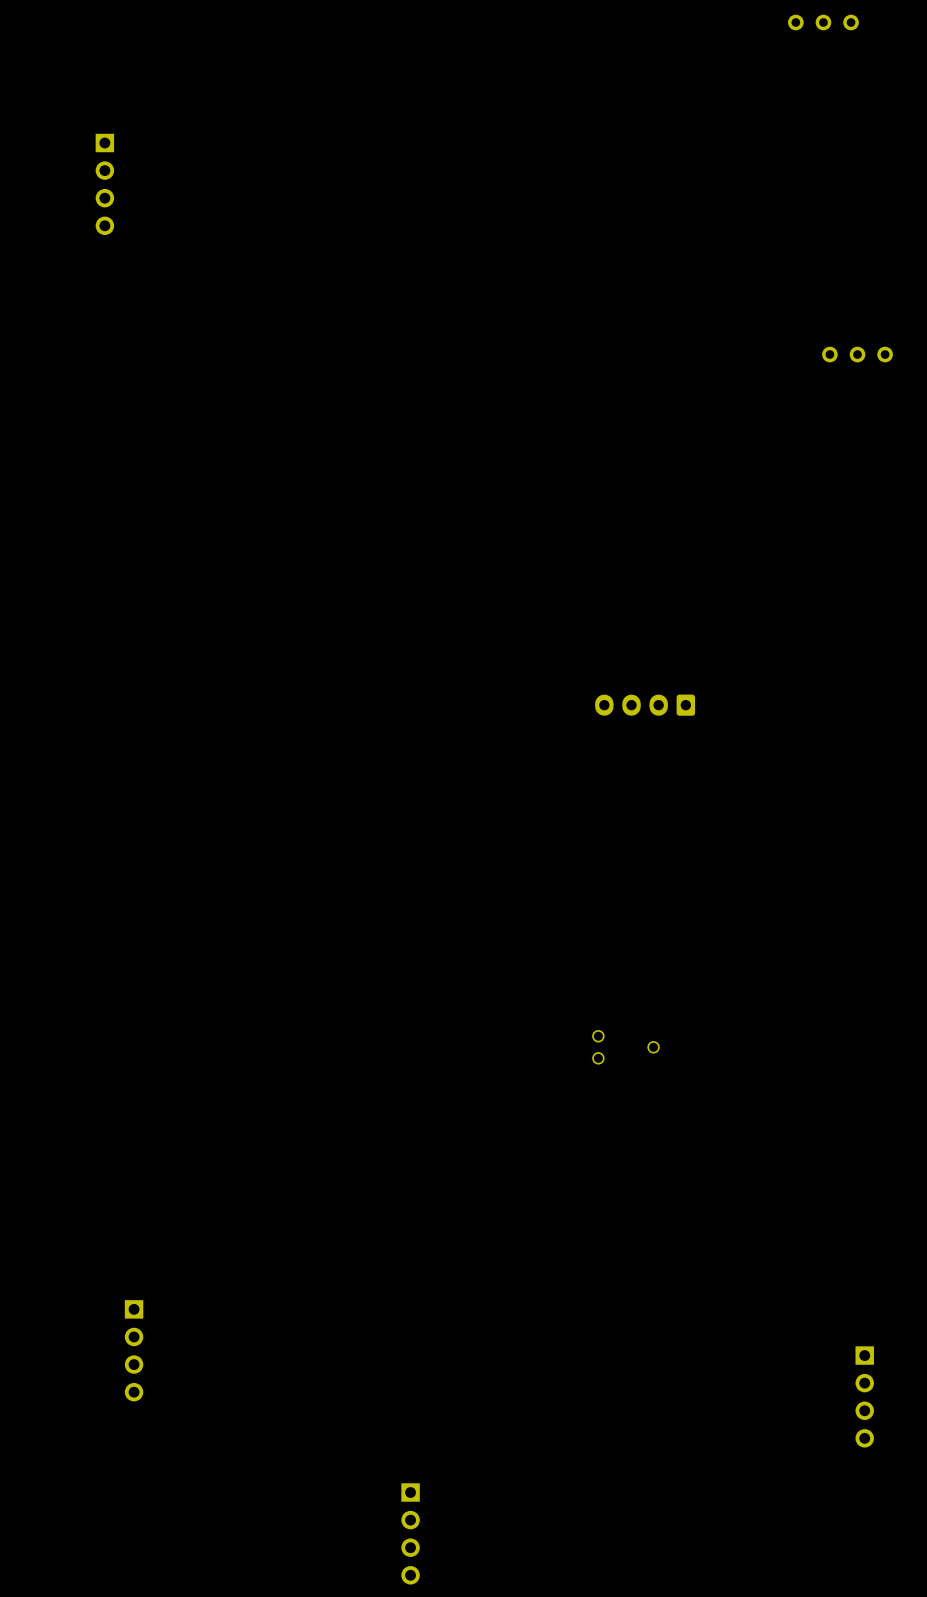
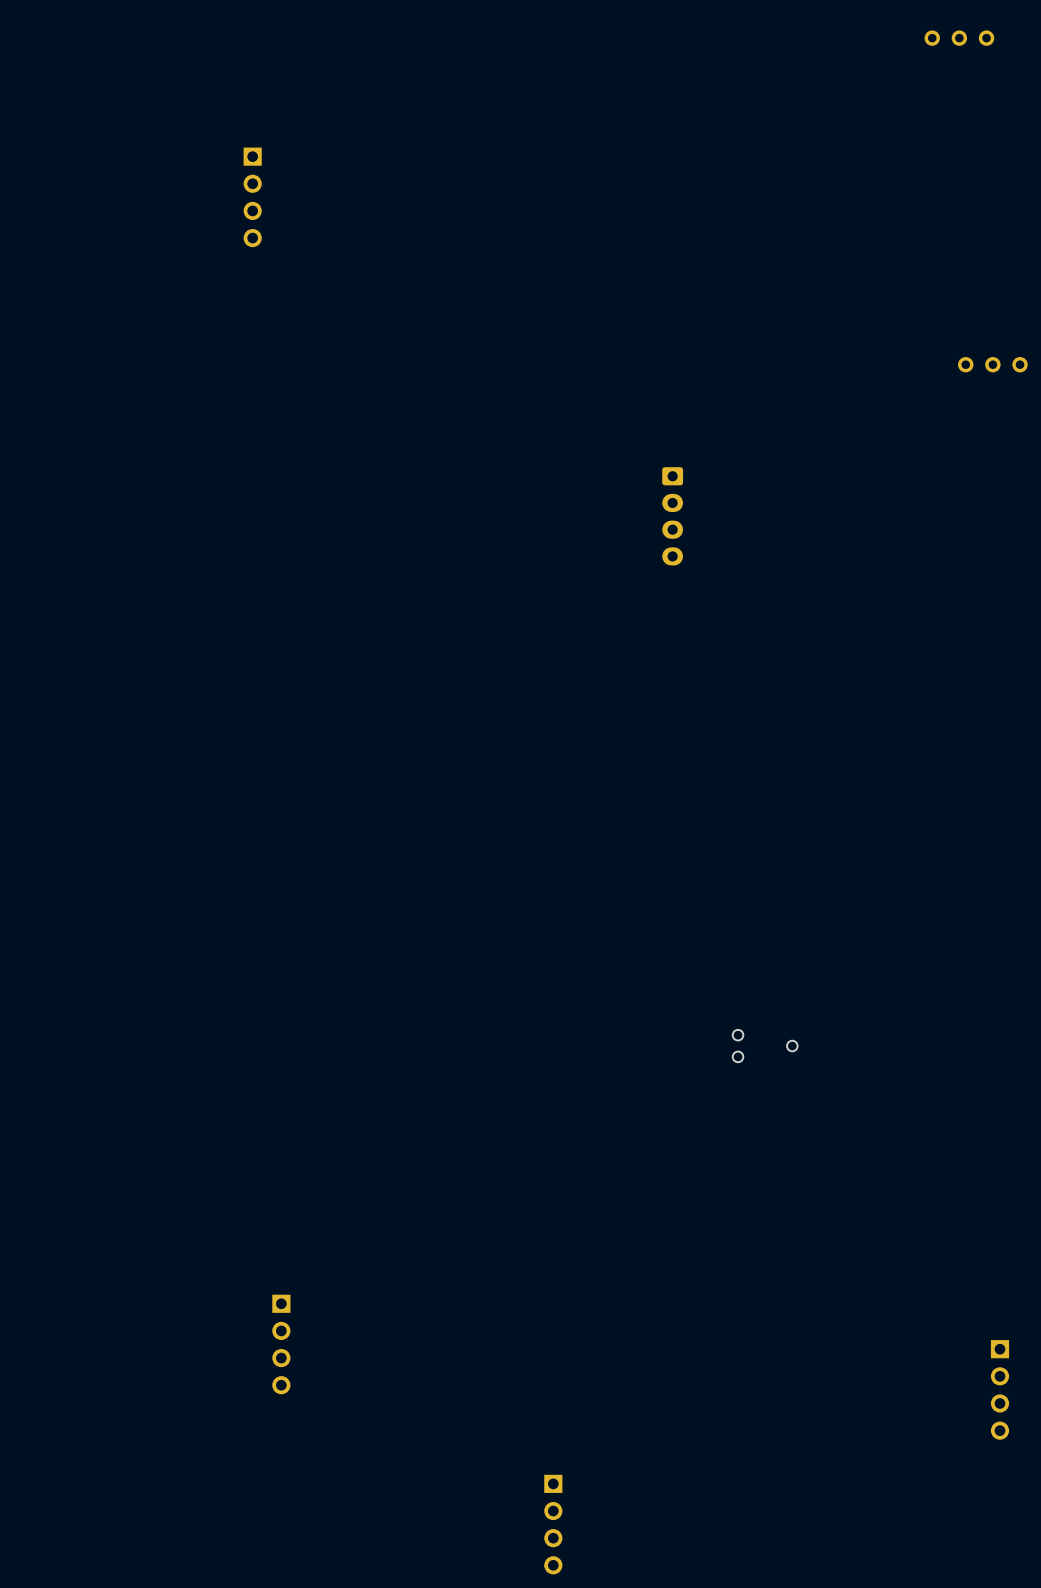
part rotation: 0° (645, 705) -> 90° counterclockwise (672, 516)
part position: (645, 705) -> (672, 516)

